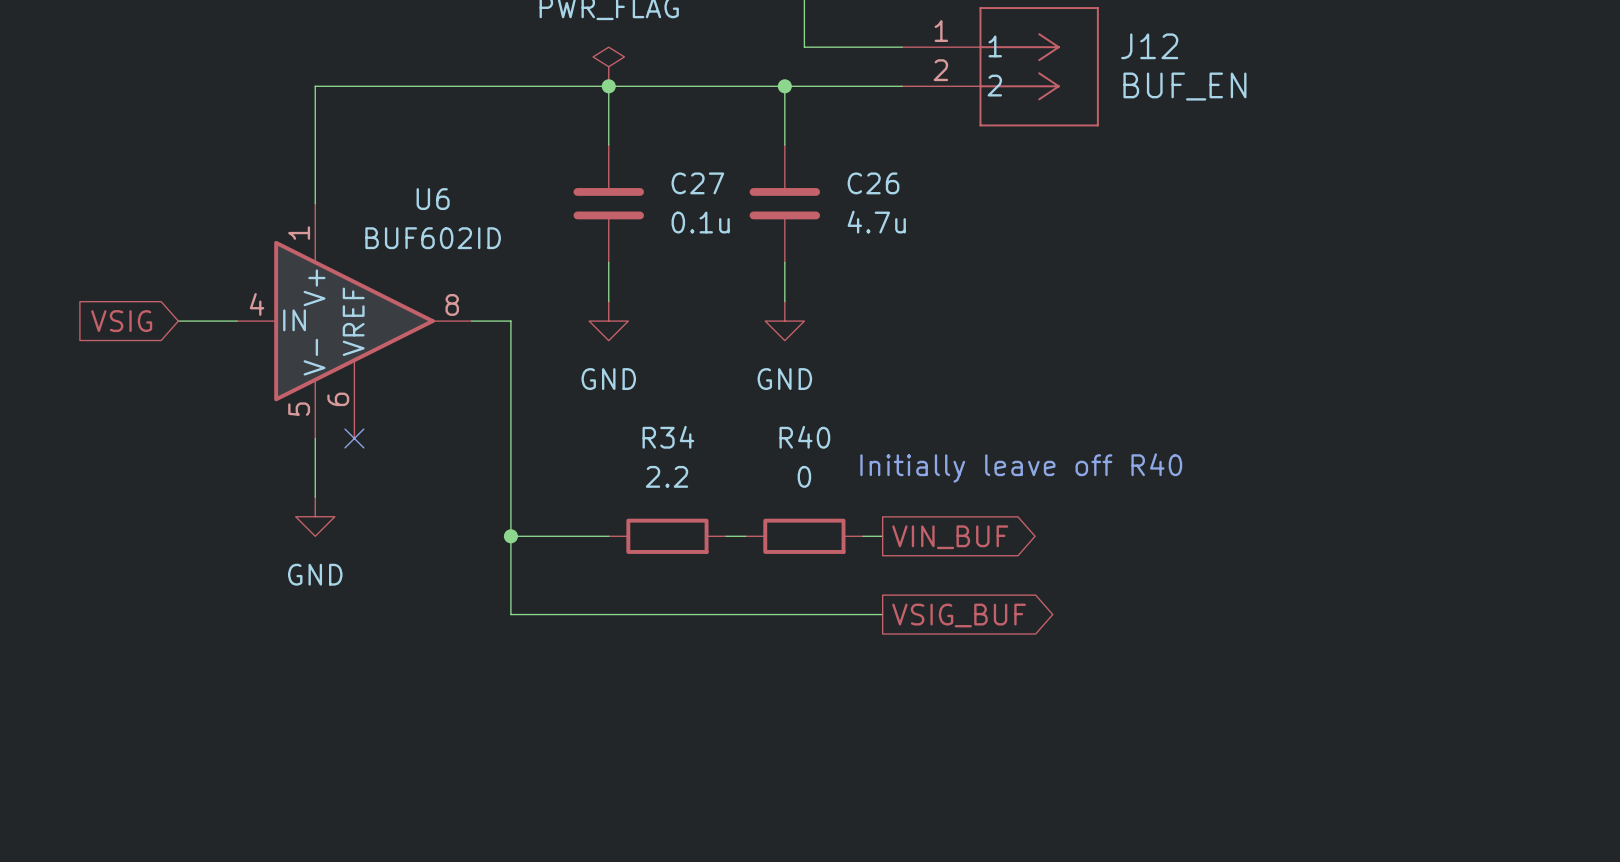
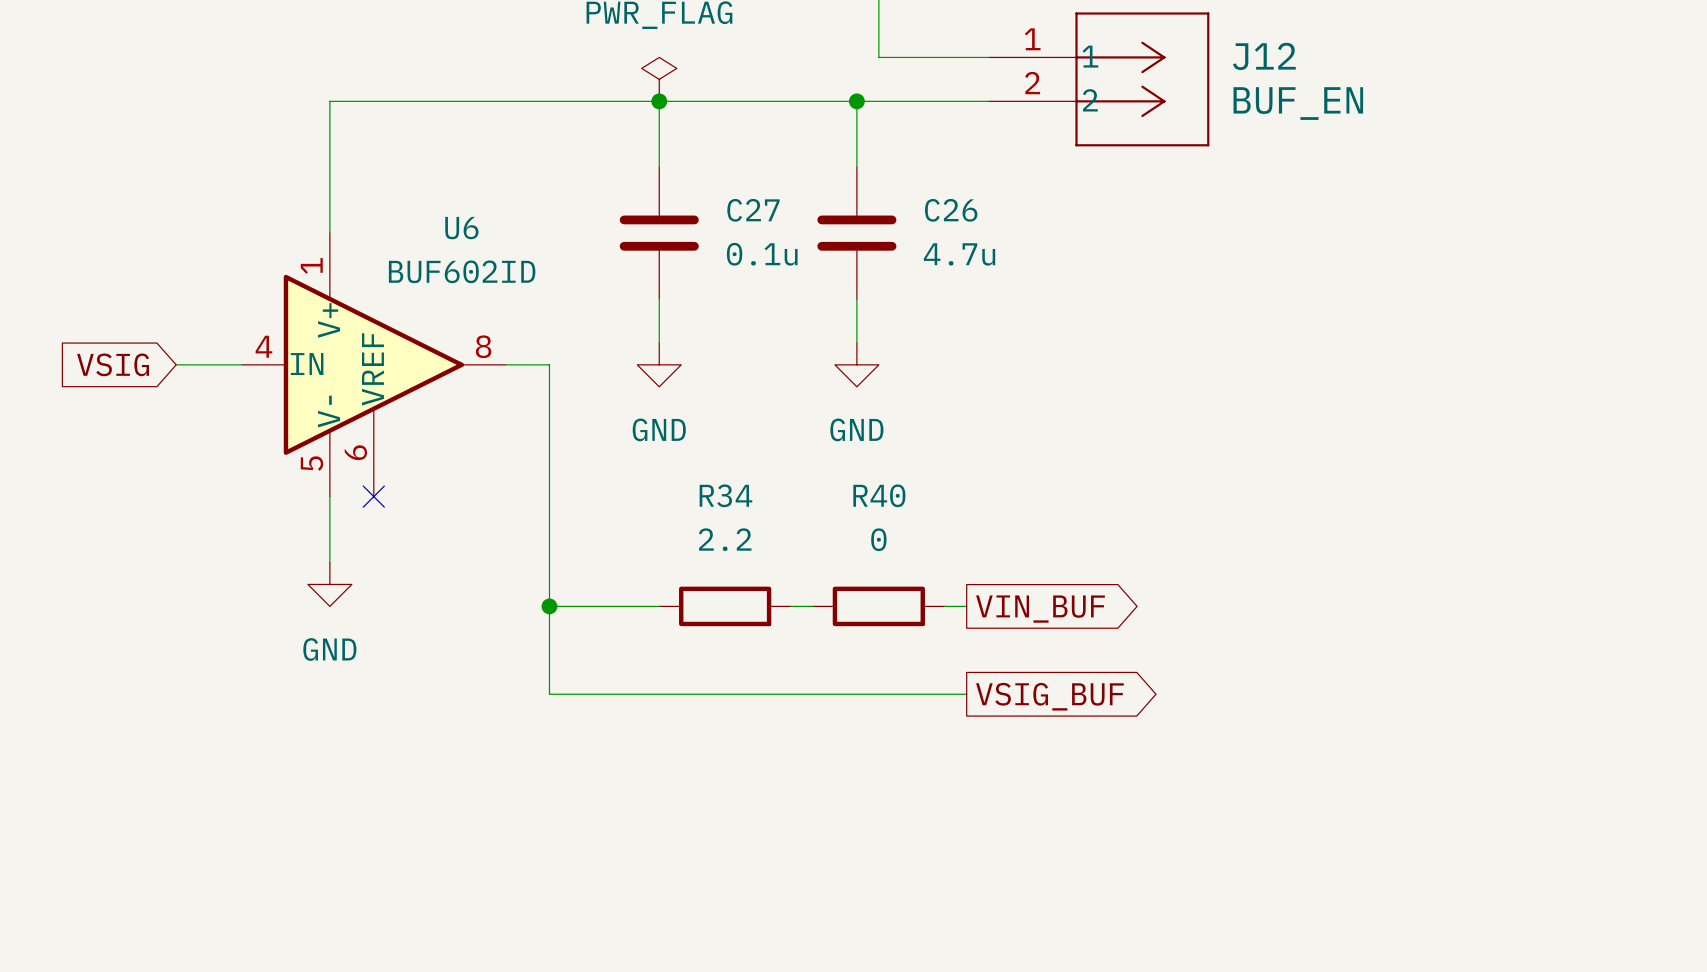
text: Initially leave off R40 (1021, 467) -> none

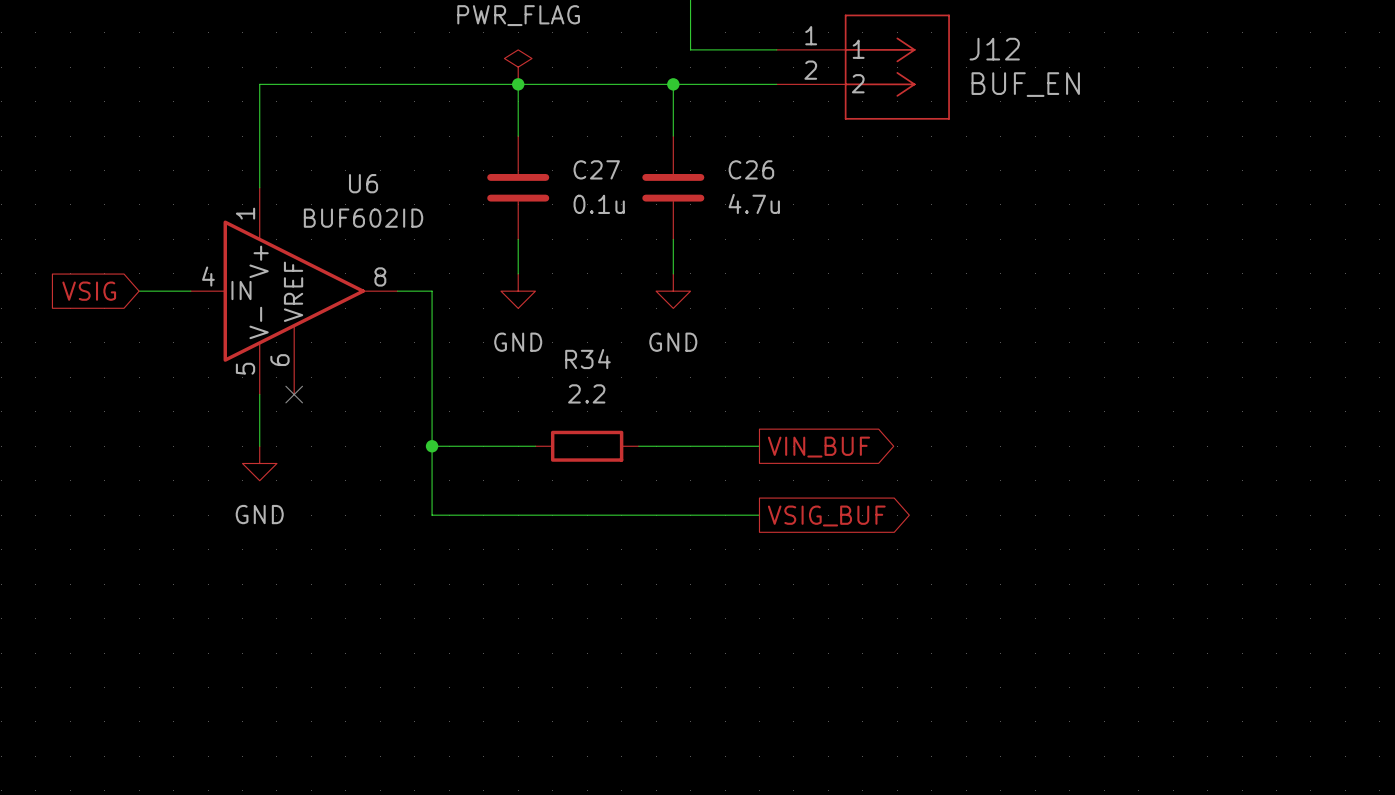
wire: none -> (432, 446) (535, 446)
wire: none -> (638, 446) (759, 446)
wire: (549, 606) (659, 606) -> none
junction position: (549, 606) -> (432, 446)
R34 position: (725, 606) -> (587, 446)
wire: (791, 606) (812, 606) -> none
R40: 0 (878, 606) -> none
wire: (944, 606) (966, 606) -> none
global label position: VIN_BUF (1040, 609) -> VIN_BUF (819, 447)
wire: (549, 650) (549, 694) (966, 694) -> (432, 515) (759, 515)
global label position: VSIG_BUF (1049, 696) -> VSIG_BUF (826, 516)

